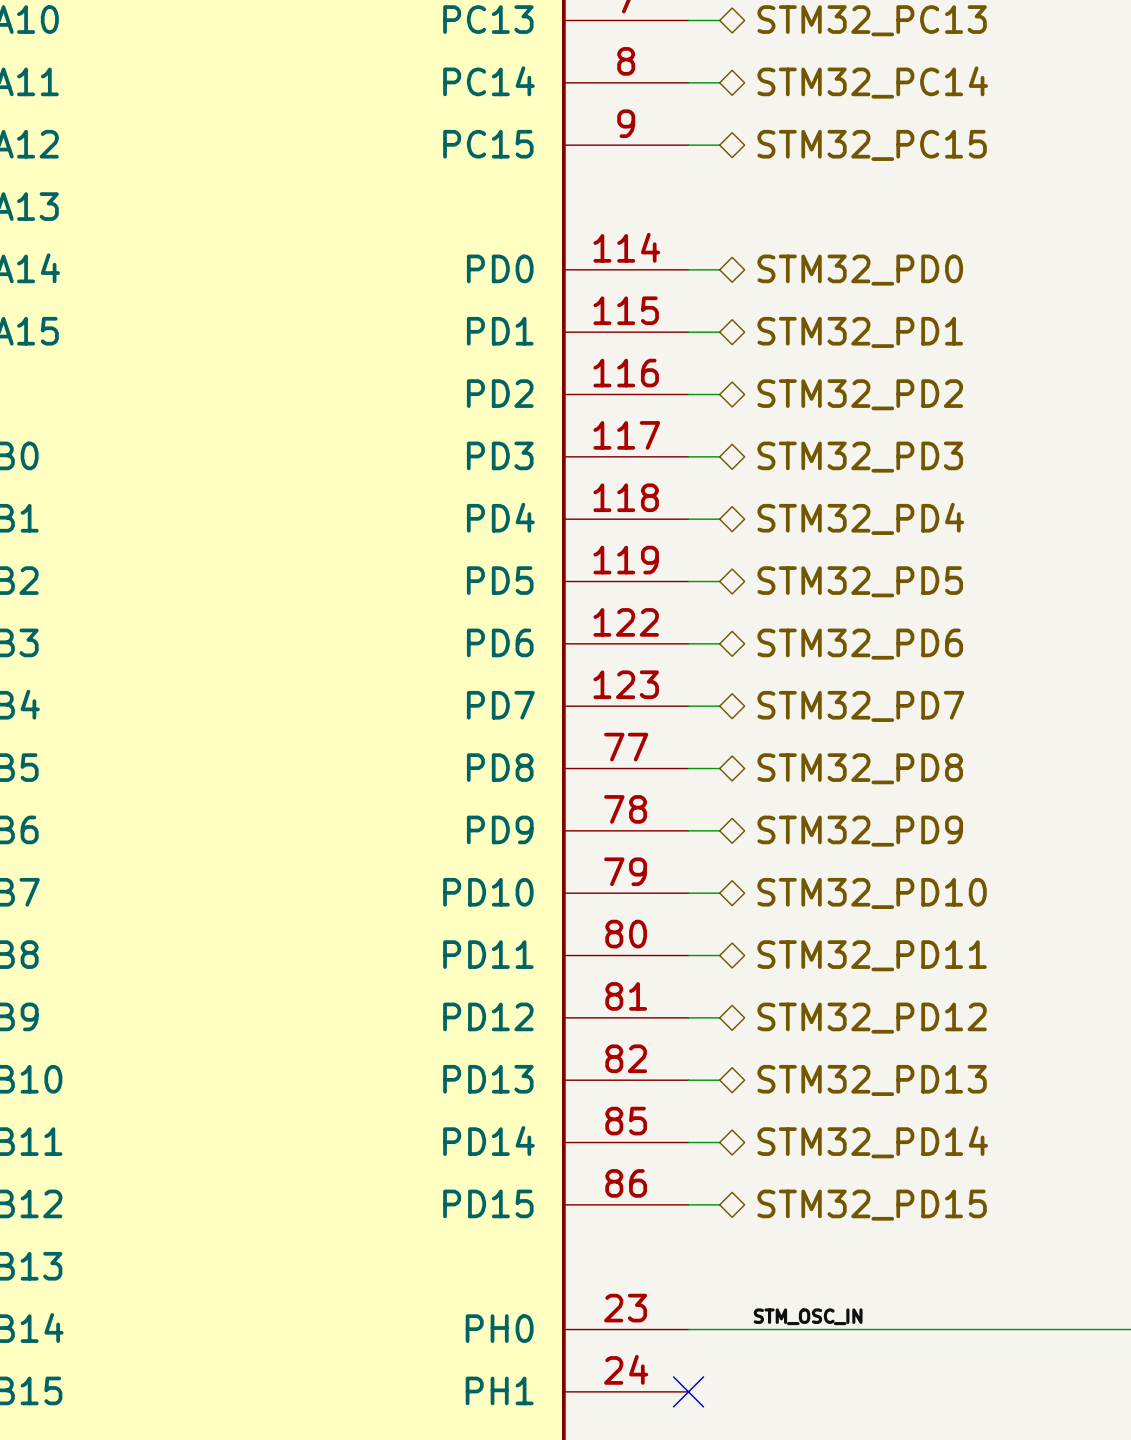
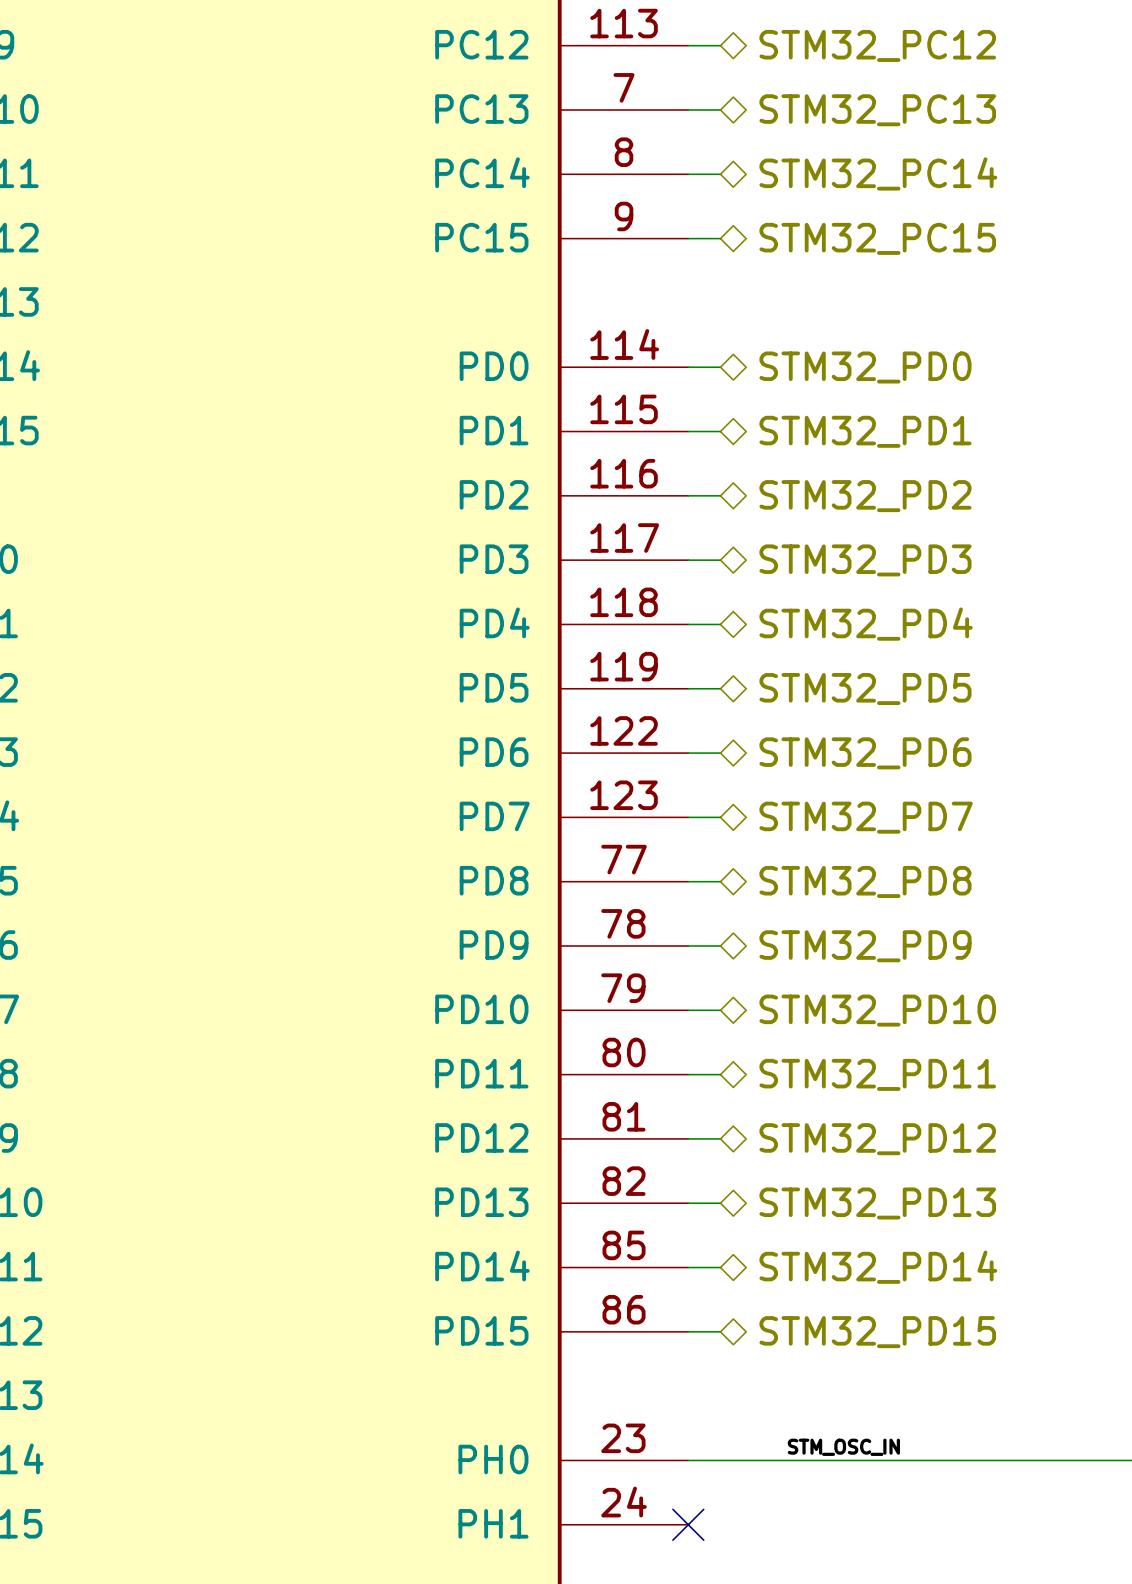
label position: STM_OSC_IN (808, 1316) -> STM_OSC_IN (843, 1447)

